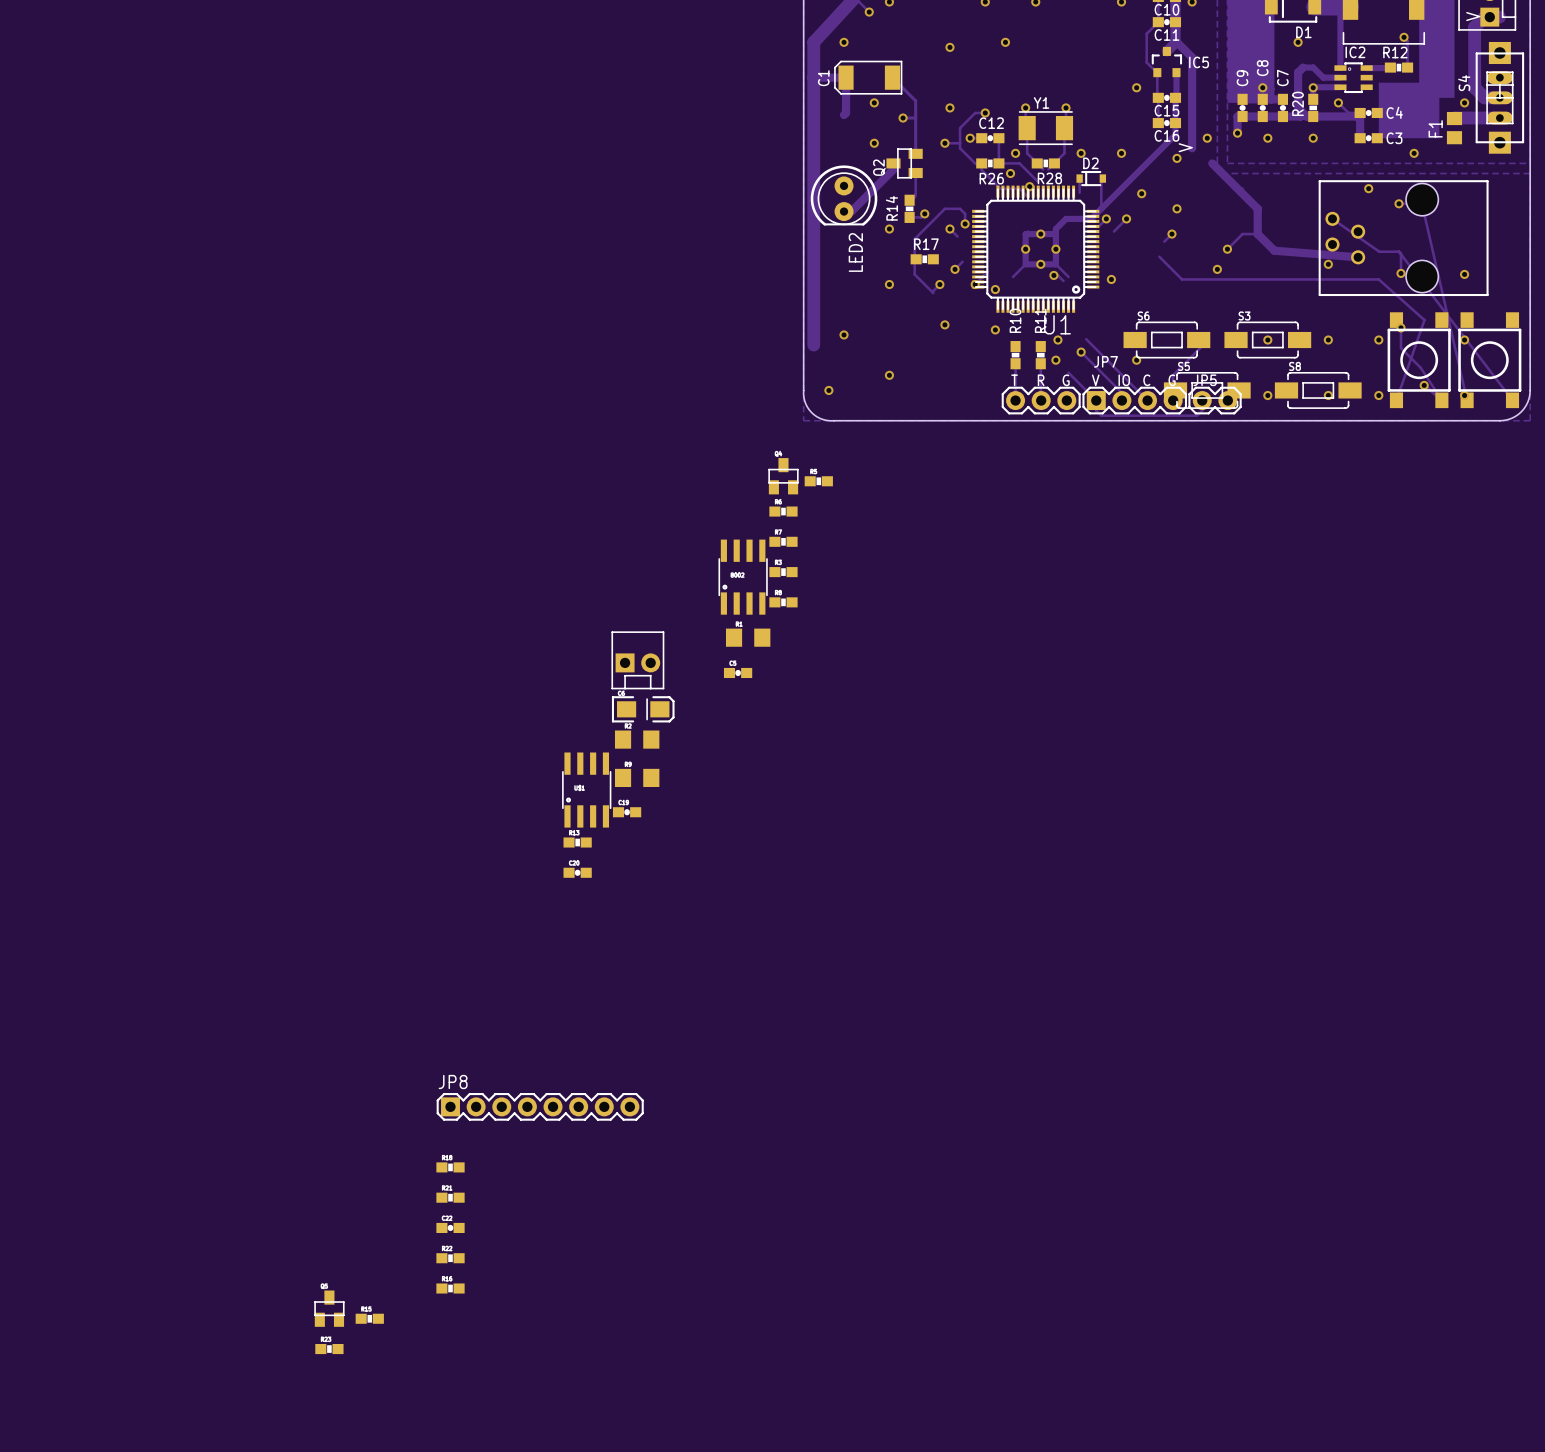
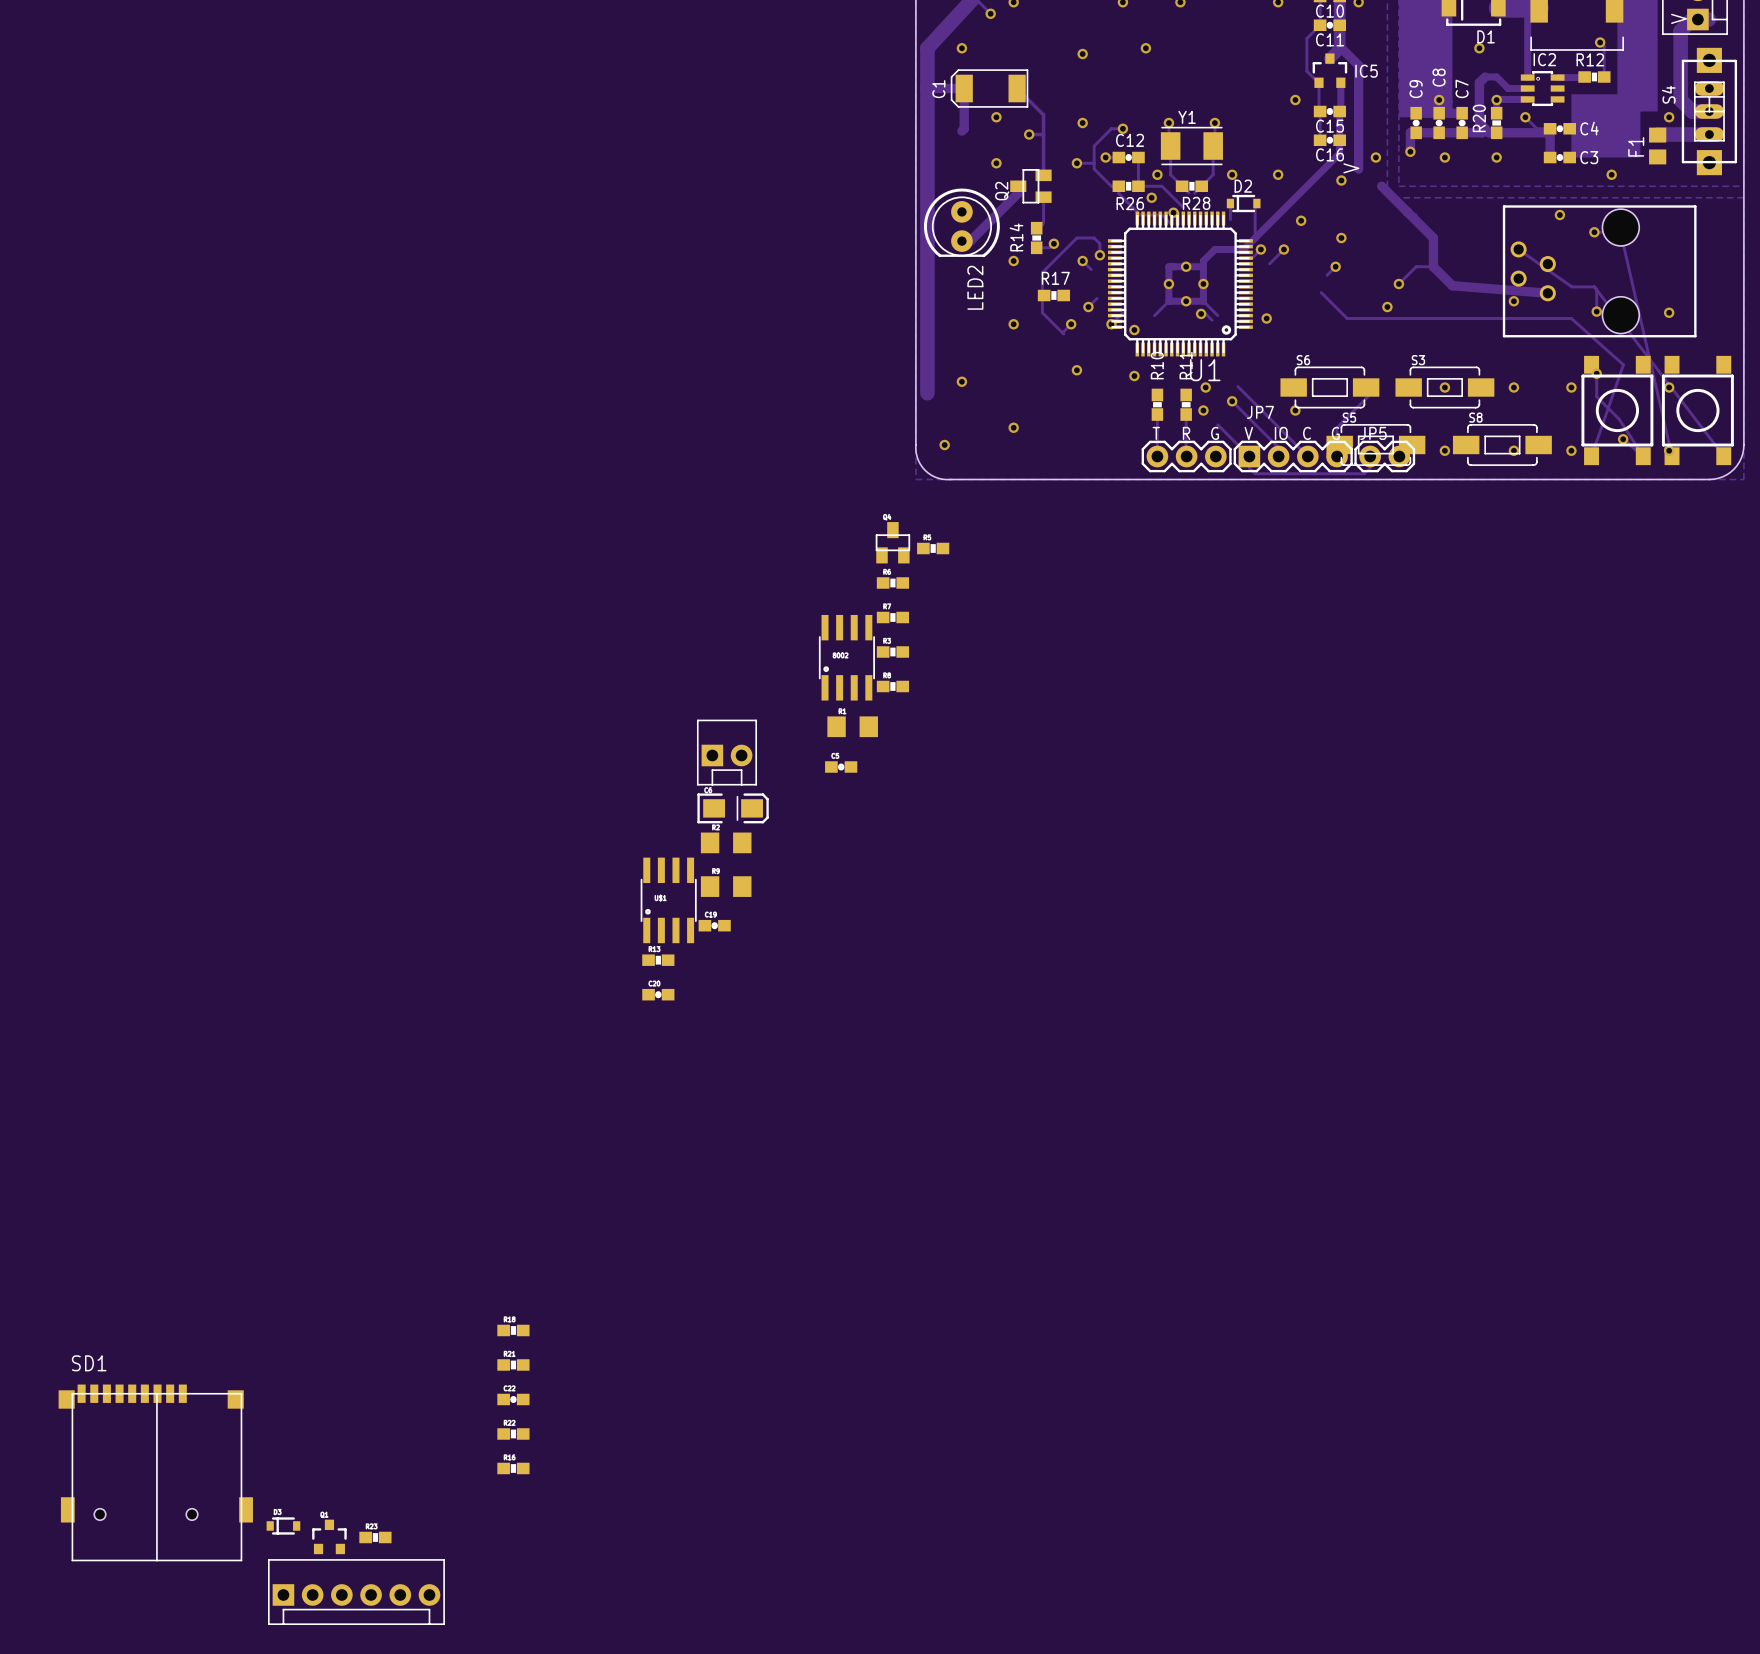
JP8: (540, 1106) -> none
SD1: none -> (155, 1472)
part: (329, 1308) -> none
part: (369, 1318) -> none
part: none -> (283, 1525)
part: none -> (329, 1536)
part: none -> (356, 1592)

